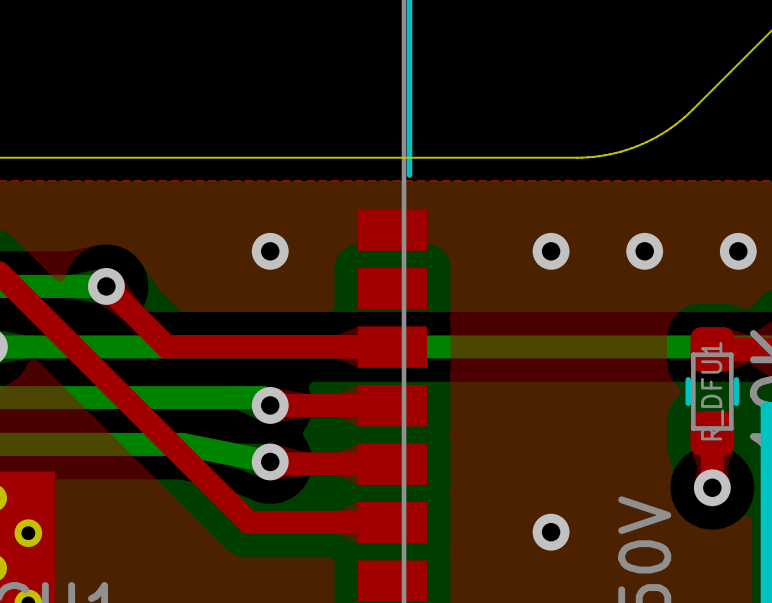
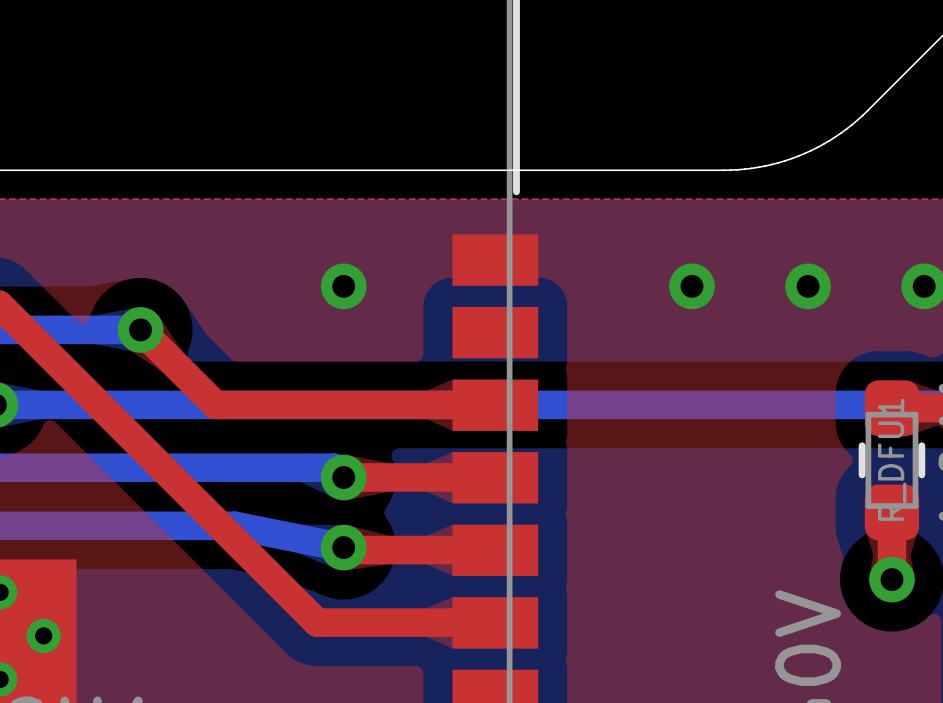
via: (551, 532) -> none

